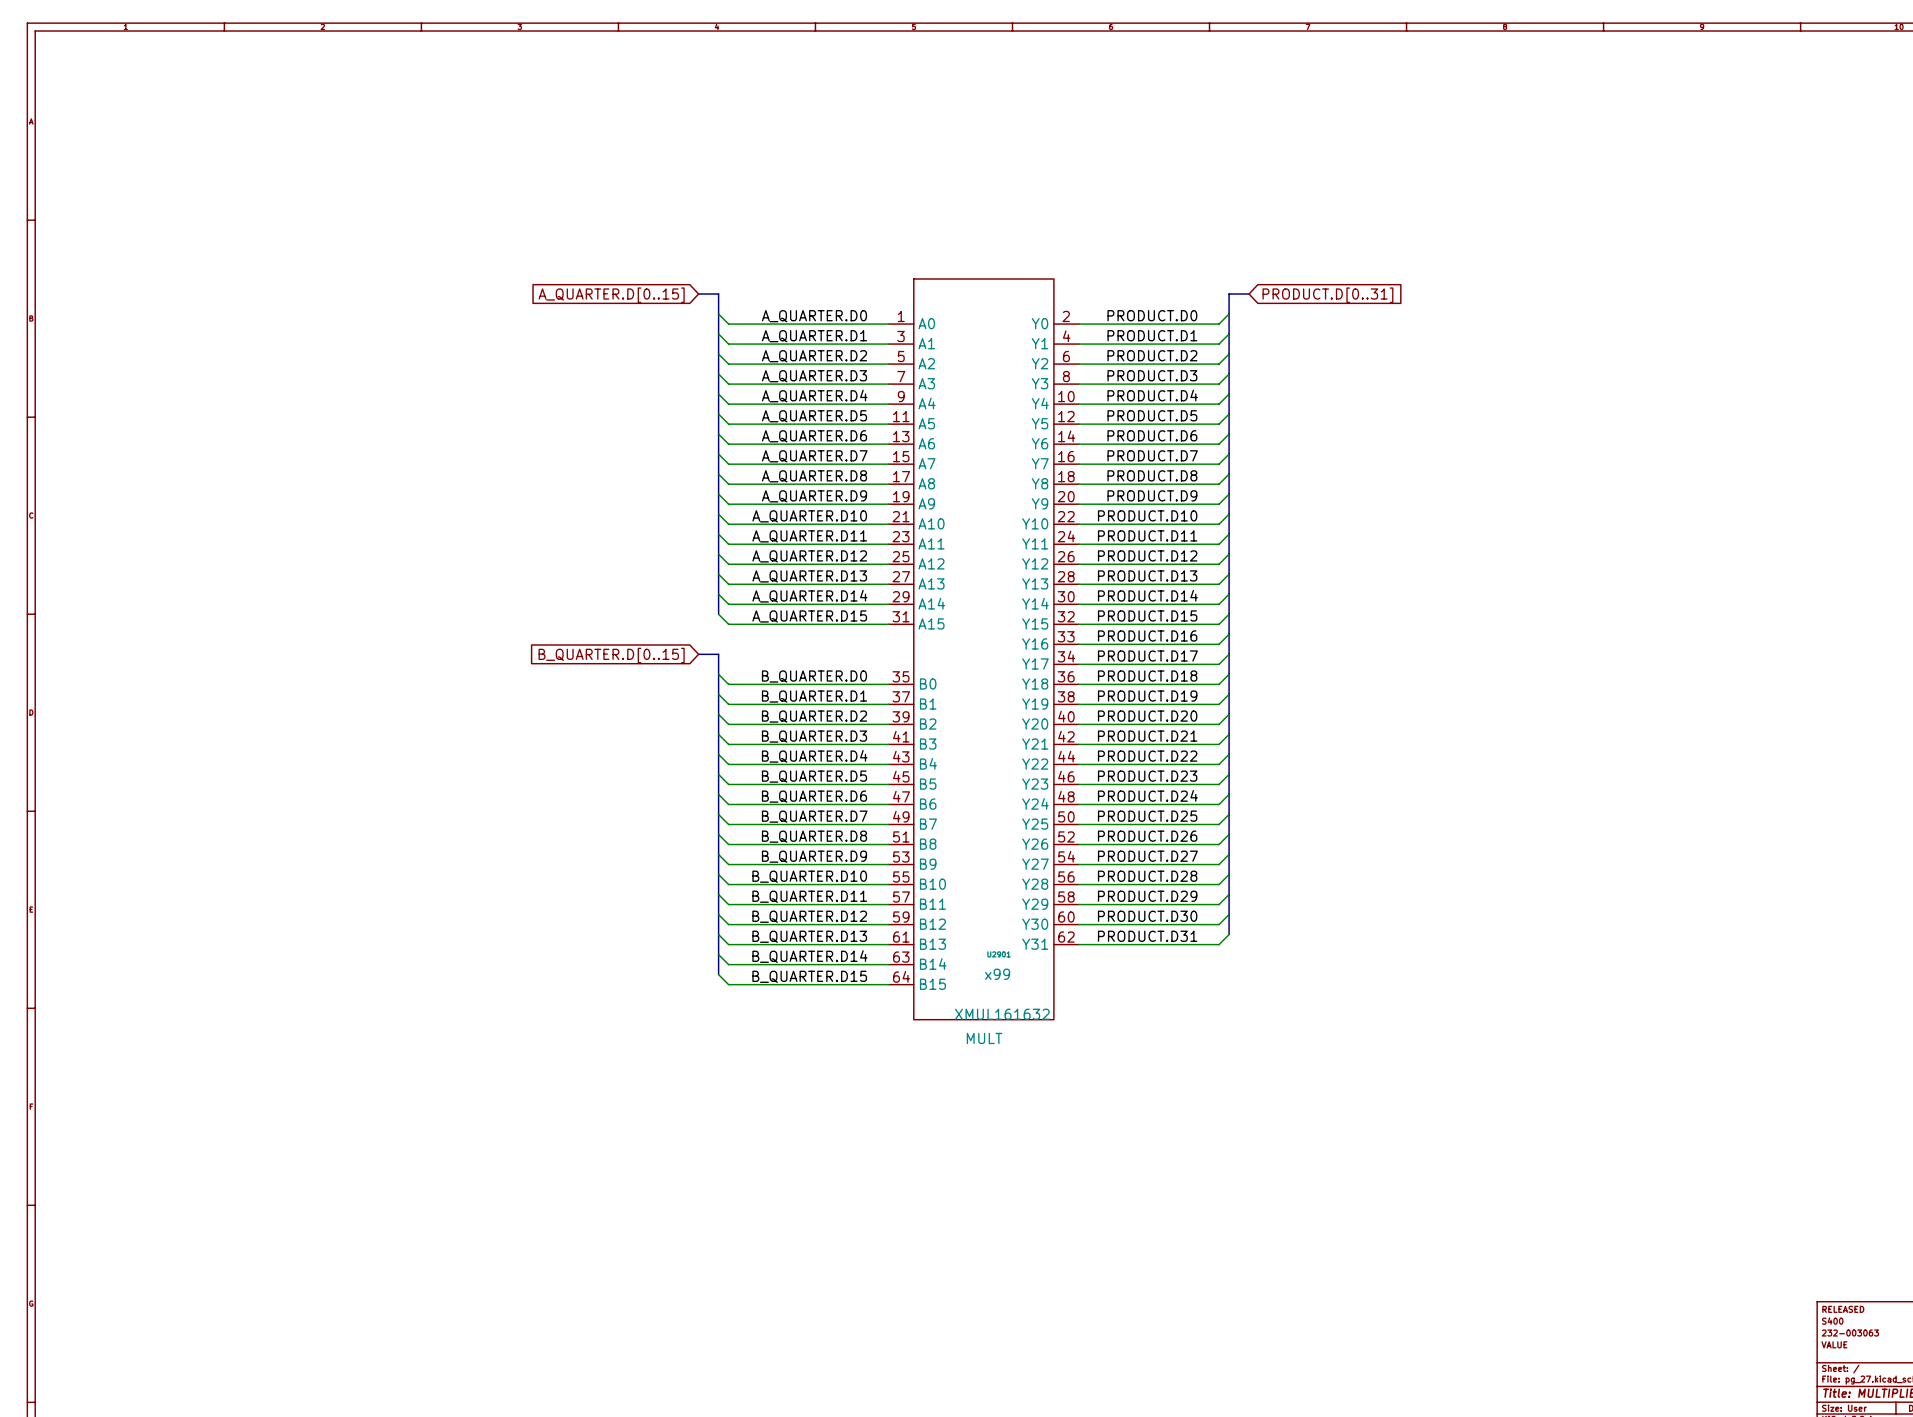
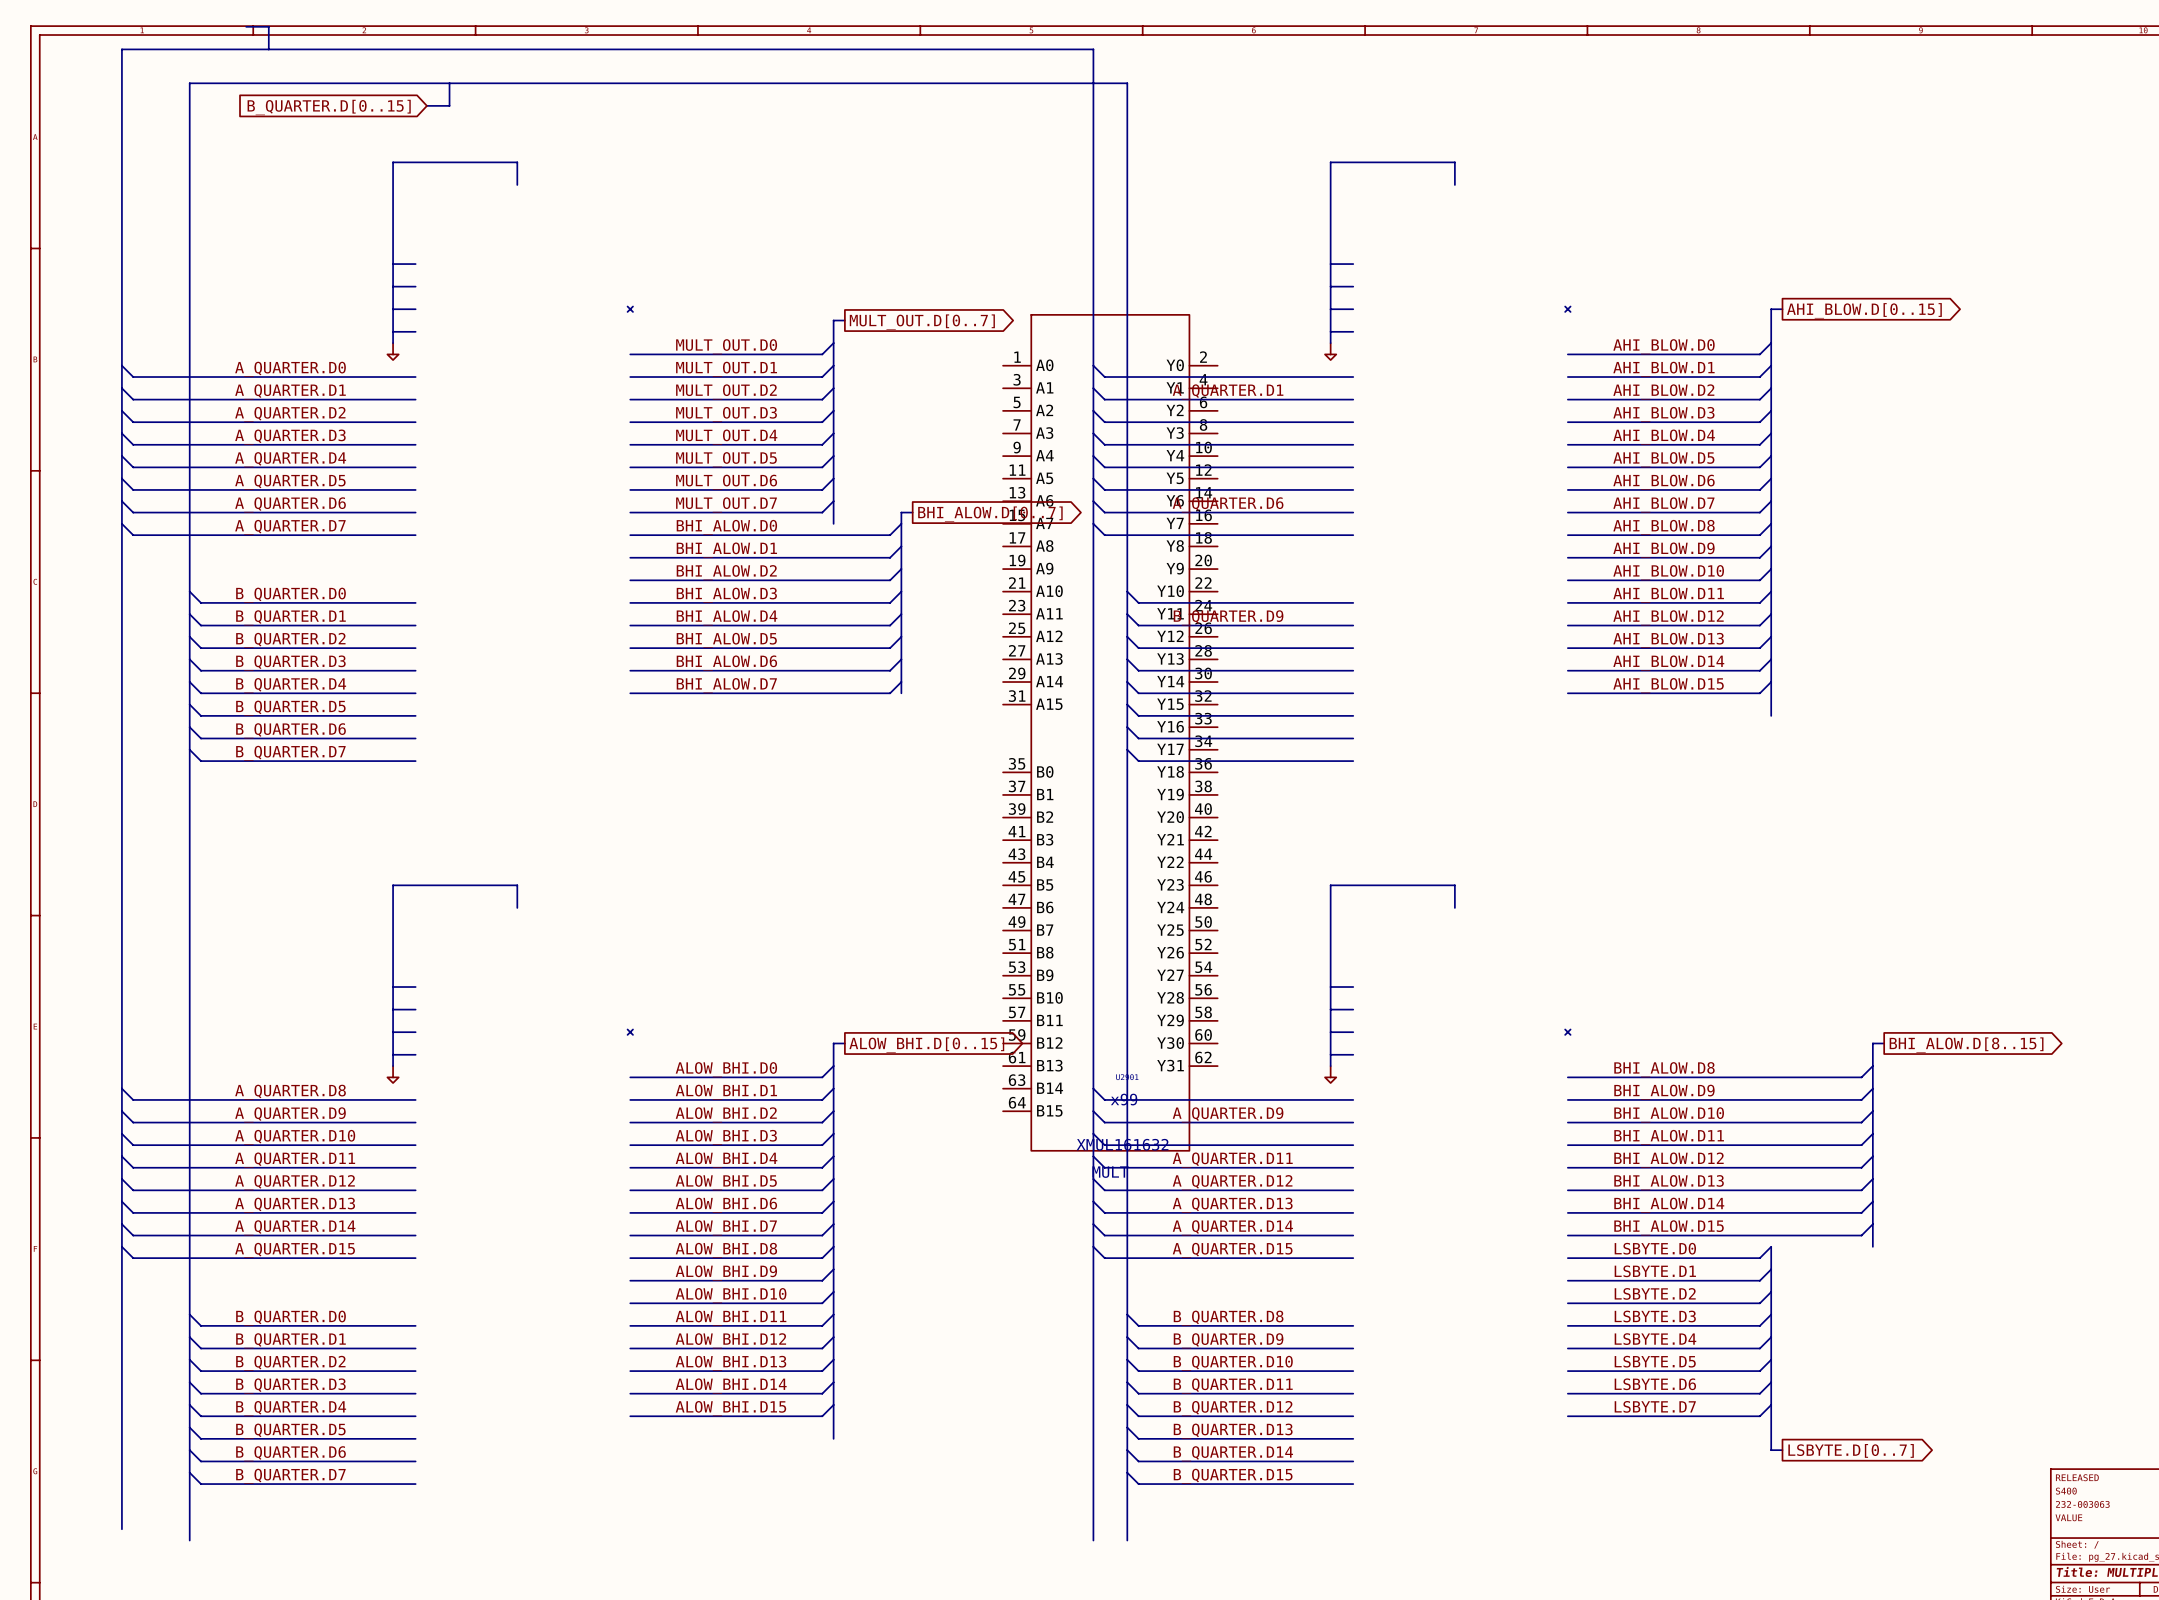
bus: none -> (246, 26) (268, 26) (268, 49)
bus: none -> (449, 83) (449, 105) (426, 105)
global label: none -> B_QUARTER.D[0..15] (329, 107)
wire: none -> (517, 184) (517, 162) (393, 162) (393, 343)
wire: none -> (1454, 184) (1454, 162) (1330, 162) (1330, 343)
wire: none -> (393, 264) (415, 264)
wire: none -> (1330, 264) (1353, 264)
wire: none -> (393, 286) (415, 286)
wire: none -> (1330, 286) (1353, 286)
wire: none -> (393, 309) (415, 309)
no-connect mark: none -> (630, 309)
wire: none -> (1330, 309) (1353, 309)
no-connect mark: none -> (1567, 309)
bus: none -> (1782, 309) (1771, 309) (1771, 715)
global label: none -> AHI_BLOW.D[0..15] (1864, 310)
bus: none -> (844, 320) (833, 320) (833, 523)
global label: none -> MULT_OUT.D[0..7] (922, 322)
wire: none -> (393, 331) (415, 331)
bus: (698, 294) (718, 294) (718, 614) -> none
wire: none -> (1330, 331) (1353, 331)
bus: (1249, 294) (1229, 294) (1229, 934) -> none
global label: A_QUARTER.D[0..15] (611, 295) -> none
global label: PRODUCT.D[0..31] (1327, 295) -> none
wire: none -> (833, 343) (822, 354) (630, 354)
wire: none -> (1771, 343) (1759, 354) (1567, 354)
label: none -> MULT_OUT.D0 (726, 346)
label: none -> AHI_BLOW.D0 (1663, 346)
power symbol: none -> (393, 351)
power symbol: none -> (1330, 351)
wire: (718, 314) (728, 324) (888, 324) -> none
wire: (1229, 314) (1219, 324) (1078, 324) -> none
label: PRODUCT.D0 (1152, 315) -> none
label: A_QUARTER.D0 (814, 316) -> none
wire: none -> (121, 365) (133, 377) (415, 377)
wire: none -> (833, 365) (822, 377) (630, 377)
wire: none -> (1093, 365) (1104, 377) (1353, 377)
wire: none -> (1771, 365) (1759, 377) (1567, 377)
label: none -> A_QUARTER.D0 (290, 369)
label: none -> MULT_OUT.D1 (726, 369)
label: none -> AHI_BLOW.D1 (1663, 369)
wire: (718, 334) (728, 344) (888, 344) -> none
wire: (1229, 334) (1219, 344) (1078, 344) -> none
label: PRODUCT.D1 (1152, 335) -> none
label: A_QUARTER.D1 (814, 336) -> none
wire: none -> (121, 388) (133, 399) (415, 399)
wire: none -> (833, 388) (822, 399) (630, 399)
wire: none -> (1093, 388) (1104, 399) (1353, 399)
wire: none -> (1771, 388) (1759, 399) (1567, 399)
label: none -> A_QUARTER.D1 (290, 391)
label: none -> MULT_OUT.D2 (726, 391)
label: none -> A_QUARTER.D1 (1228, 391)
label: none -> AHI_BLOW.D2 (1663, 391)
wire: (718, 354) (728, 364) (888, 364) -> none
wire: (1229, 354) (1219, 364) (1078, 364) -> none
label: PRODUCT.D2 (1152, 355) -> none
label: A_QUARTER.D2 (814, 356) -> none
wire: none -> (121, 410) (133, 422) (415, 422)
wire: none -> (833, 410) (822, 422) (630, 422)
wire: none -> (1093, 410) (1104, 422) (1353, 422)
wire: none -> (1771, 410) (1759, 422) (1567, 422)
label: none -> A_QUARTER.D2 (290, 414)
label: none -> MULT_OUT.D3 (726, 414)
label: none -> AHI_BLOW.D3 (1663, 414)
wire: (718, 374) (728, 384) (888, 384) -> none
wire: (1229, 374) (1219, 384) (1078, 384) -> none
label: PRODUCT.D3 (1152, 375) -> none
label: A_QUARTER.D3 (814, 376) -> none
wire: none -> (121, 433) (133, 444) (415, 444)
wire: none -> (833, 433) (822, 444) (630, 444)
wire: none -> (1093, 433) (1104, 444) (1353, 444)
wire: none -> (1771, 433) (1759, 444) (1567, 444)
label: none -> A_QUARTER.D3 (290, 437)
label: none -> MULT_OUT.D4 (726, 437)
label: none -> AHI_BLOW.D4 (1664, 437)
wire: (718, 394) (728, 404) (888, 404) -> none
wire: (1229, 394) (1219, 404) (1078, 404) -> none
label: PRODUCT.D4 (1152, 395) -> none
label: A_QUARTER.D4 (814, 396) -> none
wire: none -> (121, 456) (133, 467) (415, 467)
wire: none -> (833, 456) (822, 467) (630, 467)
wire: none -> (1093, 456) (1104, 467) (1353, 467)
wire: none -> (1771, 456) (1759, 467) (1567, 467)
label: none -> A_QUARTER.D4 (290, 459)
label: none -> MULT_OUT.D5 (726, 459)
label: none -> AHI_BLOW.D5 (1663, 459)
wire: (718, 414) (728, 424) (888, 424) -> none
wire: (1229, 414) (1219, 424) (1078, 424) -> none
label: PRODUCT.D5 (1152, 415) -> none
label: A_QUARTER.D5 (814, 416) -> none
wire: none -> (121, 478) (133, 489) (415, 489)
wire: none -> (833, 478) (822, 489) (630, 489)
wire: none -> (1093, 478) (1104, 489) (1353, 489)
wire: none -> (1771, 478) (1759, 489) (1567, 489)
label: none -> A_QUARTER.D5 (290, 482)
label: none -> MULT_OUT.D6 (726, 482)
label: none -> AHI_BLOW.D6 (1663, 482)
wire: (718, 434) (728, 444) (888, 444) -> none
wire: (1229, 434) (1219, 444) (1078, 444) -> none
label: PRODUCT.D6 (1152, 435) -> none
label: A_QUARTER.D6 (814, 436) -> none
wire: none -> (121, 501) (133, 512) (415, 512)
wire: none -> (833, 501) (822, 512) (630, 512)
wire: none -> (1093, 501) (1104, 512) (1353, 512)
wire: none -> (1771, 501) (1759, 512) (1567, 512)
label: none -> A_QUARTER.D6 (290, 504)
label: none -> MULT_OUT.D7 (726, 504)
label: none -> A_QUARTER.D6 (1228, 504)
label: none -> AHI_BLOW.D7 (1663, 504)
wire: (718, 454) (728, 464) (888, 464) -> none
bus: none -> (912, 512) (901, 512) (901, 693)
wire: (1229, 454) (1219, 464) (1078, 464) -> none
global label: none -> BHI_ALOW.D[0..7] (990, 514)
label: PRODUCT.D7 (1152, 455) -> none
label: A_QUARTER.D7 (814, 456) -> none
wire: none -> (121, 523) (133, 535) (415, 535)
wire: none -> (901, 523) (890, 535) (630, 535)
wire: none -> (1093, 523) (1104, 535) (1353, 535)
wire: none -> (1771, 523) (1759, 535) (1567, 535)
label: none -> A_QUARTER.D7 (290, 527)
label: none -> BHI_ALOW.D0 (726, 527)
label: none -> AHI_BLOW.D8 (1664, 527)
wire: (718, 474) (728, 484) (888, 484) -> none
wire: (1229, 474) (1219, 484) (1078, 484) -> none
label: PRODUCT.D8 (1152, 475) -> none
label: A_QUARTER.D8 (814, 476) -> none
wire: none -> (901, 546) (890, 557) (630, 557)
wire: none -> (1771, 546) (1759, 557) (1567, 557)
label: none -> BHI_ALOW.D1 (726, 550)
label: none -> AHI_BLOW.D9 (1663, 550)
wire: (718, 494) (728, 504) (888, 504) -> none
wire: (1229, 494) (1219, 504) (1078, 504) -> none
label: PRODUCT.D9 (1152, 495) -> none
label: A_QUARTER.D9 (814, 496) -> none
wire: none -> (901, 569) (890, 580) (630, 580)
wire: none -> (1771, 569) (1759, 580) (1567, 580)
label: none -> BHI_ALOW.D2 (726, 572)
label: none -> AHI_BLOW.D10 (1668, 572)
wire: (718, 514) (728, 524) (888, 524) -> none
wire: (1229, 514) (1219, 524) (1078, 524) -> none
label: PRODUCT.D10 (1147, 515) -> none
label: A_QUARTER.D10 (809, 516) -> none
wire: none -> (189, 591) (201, 602) (415, 602)
wire: none -> (901, 591) (890, 602) (630, 602)
wire: none -> (1127, 591) (1138, 602) (1353, 602)
wire: none -> (1771, 591) (1759, 602) (1567, 602)
label: none -> B_QUARTER.D0 (291, 595)
label: none -> BHI_ALOW.D3 (726, 595)
label: none -> AHI_BLOW.D11 (1668, 595)
wire: (718, 534) (728, 544) (888, 544) -> none
wire: (1229, 534) (1219, 544) (1078, 544) -> none
label: PRODUCT.D11 (1147, 535) -> none
label: A_QUARTER.D11 (809, 536) -> none
wire: none -> (189, 614) (201, 625) (415, 625)
wire: none -> (901, 614) (890, 625) (630, 625)
wire: none -> (1127, 614) (1138, 625) (1353, 625)
wire: none -> (1771, 614) (1759, 625) (1567, 625)
label: none -> B_QUARTER.D1 (290, 617)
label: none -> BHI_ALOW.D4 (727, 617)
label: none -> B_QUARTER.D9 (1228, 617)
label: none -> AHI_BLOW.D12 (1668, 617)
wire: (718, 554) (728, 564) (888, 564) -> none
wire: (1229, 554) (1219, 564) (1078, 564) -> none
label: PRODUCT.D12 (1147, 555) -> none
label: A_QUARTER.D12 (809, 556) -> none
wire: none -> (189, 636) (201, 648) (415, 648)
wire: none -> (901, 636) (890, 648) (630, 648)
wire: none -> (1127, 636) (1138, 648) (1353, 648)
wire: none -> (1771, 636) (1759, 648) (1567, 648)
label: none -> B_QUARTER.D2 (290, 640)
label: none -> BHI_ALOW.D5 (726, 640)
label: none -> AHI_BLOW.D13 (1668, 640)
wire: (718, 574) (728, 584) (888, 584) -> none
wire: (1229, 574) (1219, 584) (1078, 584) -> none
label: PRODUCT.D13 (1147, 575) -> none
label: A_QUARTER.D13 (809, 576) -> none
wire: none -> (189, 659) (201, 670) (415, 670)
wire: none -> (901, 659) (890, 670) (630, 670)
wire: none -> (1127, 659) (1138, 670) (1353, 670)
wire: none -> (1771, 659) (1759, 670) (1567, 670)
label: none -> B_QUARTER.D3 (290, 663)
label: none -> BHI_ALOW.D6 (726, 663)
label: none -> AHI_BLOW.D14 (1668, 663)
wire: (718, 594) (728, 604) (888, 604) -> none
wire: (1229, 594) (1219, 604) (1078, 604) -> none
label: PRODUCT.D14 (1147, 595) -> none
label: A_QUARTER.D14 (809, 596) -> none
wire: none -> (189, 682) (201, 693) (415, 693)
wire: none -> (901, 682) (890, 693) (630, 693)
wire: none -> (1127, 682) (1138, 693) (1353, 693)
wire: none -> (1771, 682) (1759, 693) (1567, 693)
label: none -> B_QUARTER.D4 (291, 685)
label: none -> BHI_ALOW.D7 (726, 685)
label: none -> AHI_BLOW.D15 (1668, 685)
wire: (718, 614) (728, 624) (888, 624) -> none
wire: (1229, 614) (1219, 624) (1078, 624) -> none
label: PRODUCT.D15 (1147, 615) -> none
label: A_QUARTER.D15 (809, 616) -> none
wire: none -> (189, 704) (201, 715) (415, 715)
wire: none -> (1127, 704) (1138, 715) (1353, 715)
label: none -> B_QUARTER.D5 (290, 708)
wire: (1229, 634) (1219, 644) (1078, 644) -> none
label: PRODUCT.D16 (1147, 636) -> none
wire: none -> (189, 727) (201, 738) (415, 738)
wire: none -> (1127, 727) (1138, 738) (1353, 738)
label: none -> B_QUARTER.D6 (291, 730)
bus: (698, 654) (718, 654) (718, 974) -> none
wire: (1229, 654) (1219, 664) (1078, 664) -> none
global label: B_QUARTER.D[0..15] (611, 655) -> none
label: PRODUCT.D17 (1147, 656) -> none
wire: none -> (189, 749) (201, 761) (415, 761)
wire: none -> (1127, 749) (1138, 761) (1353, 761)
label: none -> B_QUARTER.D7 (290, 753)
wire: (718, 674) (728, 684) (888, 684) -> none
wire: (1229, 674) (1219, 684) (1078, 684) -> none
label: B_QUARTER.D0 (814, 676) -> none
label: PRODUCT.D18 (1147, 676) -> none
wire: (718, 694) (728, 704) (888, 704) -> none
wire: (1229, 694) (1219, 704) (1078, 704) -> none
label: B_QUARTER.D1 (814, 696) -> none
label: PRODUCT.D19 (1147, 696) -> none
wire: (718, 714) (728, 724) (888, 724) -> none
wire: (1229, 714) (1219, 724) (1078, 724) -> none
label: B_QUARTER.D2 (814, 716) -> none
label: PRODUCT.D20 (1147, 716) -> none
wire: (718, 734) (728, 744) (888, 744) -> none
wire: (1229, 734) (1219, 744) (1078, 744) -> none
label: B_QUARTER.D3 (814, 736) -> none
label: PRODUCT.D21 (1147, 736) -> none
wire: (718, 754) (728, 764) (888, 764) -> none
wire: (1229, 754) (1219, 764) (1078, 764) -> none
label: B_QUARTER.D4 (814, 756) -> none
label: PRODUCT.D22 (1147, 756) -> none
wire: (718, 774) (728, 784) (888, 784) -> none
wire: (1229, 774) (1219, 784) -> (1454, 907) (1454, 885) (1375, 885)
label: B_QUARTER.D5 (814, 776) -> none
label: PRODUCT.D23 (1147, 776) -> none
wire: (1078, 784) (1179, 784) -> (1330, 1066) (1330, 885)
wire: (718, 794) (728, 804) (888, 804) -> none
wire: (1229, 794) (1219, 804) (1078, 804) -> none
label: PRODUCT.D24 (1147, 795) -> none
label: B_QUARTER.D6 (814, 796) -> none
wire: none -> (517, 907) (517, 885) (393, 885) (393, 1066)
wire: (718, 814) (728, 824) (888, 824) -> none
wire: (1229, 814) (1219, 824) (1078, 824) -> none
label: B_QUARTER.D7 (814, 816) -> none
label: PRODUCT.D25 (1147, 816) -> none
wire: (718, 834) (728, 844) (888, 844) -> none
wire: (1229, 834) (1219, 844) (1078, 844) -> none
label: B_QUARTER.D8 (814, 836) -> none
label: PRODUCT.D26 (1147, 836) -> none
wire: (718, 854) (728, 864) (888, 864) -> none
wire: (1229, 854) (1219, 864) (1078, 864) -> none
label: B_QUARTER.D9 (814, 856) -> none
label: PRODUCT.D27 (1147, 856) -> none
wire: none -> (393, 987) (415, 987)
wire: (718, 874) (728, 884) (888, 884) -> none
wire: none -> (1330, 987) (1353, 987)
wire: (1229, 874) (1219, 884) (1078, 884) -> none
label: B_QUARTER.D10 (809, 876) -> none
label: PRODUCT.D28 (1147, 876) -> none
wire: none -> (393, 1009) (415, 1009)
wire: (718, 894) (728, 904) (888, 904) -> none
wire: none -> (1330, 1009) (1353, 1009)
wire: (1229, 894) (1219, 904) (1078, 904) -> none
label: B_QUARTER.D11 (809, 896) -> none
label: PRODUCT.D29 (1147, 896) -> none
wire: none -> (393, 1032) (415, 1032)
no-connect mark: none -> (630, 1032)
wire: (718, 914) (728, 924) (888, 924) -> none
wire: none -> (1330, 1032) (1353, 1032)
wire: (1229, 914) (1219, 924) (1078, 924) -> none
no-connect mark: none -> (1567, 1032)
label: B_QUARTER.D12 (809, 916) -> none
label: PRODUCT.D30 (1147, 916) -> none
bus: none -> (844, 1043) (833, 1043) (833, 1438)
bus: none -> (1884, 1043) (1872, 1043) (1872, 1246)
global label: none -> ALOW_BHI.D[0..15] (926, 1045)
global label: none -> BHI_ALOW.D[8..15] (1966, 1045)
wire: none -> (393, 1054) (415, 1054)
wire: (718, 934) (728, 944) (888, 944) -> none
wire: none -> (1330, 1054) (1353, 1054)
wire: (1229, 934) (1219, 944) (1078, 944) -> none
label: B_QUARTER.D13 (809, 936) -> none
label: PRODUCT.D31 (1147, 936) -> none
wire: none -> (833, 1066) (822, 1077) (630, 1077)
wire: none -> (1872, 1066) (1861, 1077) (1567, 1077)
label: none -> ALOW_BHI.D0 (726, 1069)
label: none -> BHI_ALOW.D8 (1664, 1069)
power symbol: none -> (393, 1074)
power symbol: none -> (1330, 1074)
wire: (718, 954) (728, 964) (888, 964) -> none
label: B_QUARTER.D14 (809, 956) -> none
wire: none -> (121, 1088) (133, 1099) (415, 1099)
wire: none -> (833, 1088) (822, 1099) (630, 1099)
wire: none -> (1093, 1088) (1104, 1099) (1353, 1099)
wire: none -> (1872, 1088) (1861, 1099) (1567, 1099)
label: none -> A_QUARTER.D8 (290, 1092)
label: none -> ALOW_BHI.D1 (726, 1092)
label: none -> BHI_ALOW.D9 (1664, 1092)
wire: (718, 974) (728, 984) (888, 984) -> none
label: B_QUARTER.D15 (809, 976) -> none
wire: none -> (121, 1111) (133, 1122) (415, 1122)
wire: none -> (833, 1111) (822, 1122) (630, 1122)
wire: none -> (1093, 1111) (1104, 1122) (1353, 1122)
wire: none -> (1872, 1111) (1861, 1122) (1567, 1122)
label: none -> A_QUARTER.D9 (290, 1114)
label: none -> ALOW_BHI.D2 (726, 1114)
label: none -> A_QUARTER.D9 (1228, 1114)
label: none -> BHI_ALOW.D10 (1669, 1114)
wire: none -> (121, 1133) (133, 1145) (415, 1145)
wire: none -> (833, 1133) (822, 1145) (630, 1145)
wire: none -> (1093, 1133) (1104, 1145) (1353, 1145)
wire: none -> (1872, 1133) (1861, 1145) (1567, 1145)
label: none -> A_QUARTER.D10 (295, 1137)
label: none -> ALOW_BHI.D3 (726, 1137)
label: none -> BHI_ALOW.D11 (1669, 1137)
wire: none -> (121, 1156) (133, 1167) (415, 1167)
wire: none -> (833, 1156) (822, 1167) (630, 1167)
wire: none -> (1093, 1156) (1104, 1167) (1353, 1167)
wire: none -> (1872, 1156) (1861, 1167) (1567, 1167)
label: none -> A_QUARTER.D11 (295, 1160)
label: none -> ALOW_BHI.D4 (726, 1160)
label: none -> A_QUARTER.D11 (1232, 1160)
label: none -> BHI_ALOW.D12 (1668, 1160)
wire: none -> (121, 1179) (133, 1190) (415, 1190)
wire: none -> (833, 1179) (822, 1190) (630, 1190)
wire: none -> (1093, 1179) (1104, 1190) (1353, 1190)
wire: none -> (1872, 1179) (1861, 1190) (1567, 1190)
label: none -> A_QUARTER.D12 (295, 1182)
label: none -> ALOW_BHI.D5 (726, 1182)
label: none -> A_QUARTER.D12 (1232, 1182)
label: none -> BHI_ALOW.D13 (1669, 1182)
wire: none -> (121, 1201) (133, 1212) (415, 1212)
wire: none -> (833, 1201) (822, 1212) (630, 1212)
wire: none -> (1093, 1201) (1104, 1212) (1353, 1212)
wire: none -> (1872, 1201) (1861, 1212) (1567, 1212)
label: none -> A_QUARTER.D13 (295, 1205)
label: none -> ALOW_BHI.D6 (726, 1205)
label: none -> A_QUARTER.D13 (1232, 1205)
label: none -> BHI_ALOW.D14 (1669, 1205)
wire: none -> (121, 1224) (133, 1235) (415, 1235)
wire: none -> (833, 1224) (822, 1235) (630, 1235)
wire: none -> (1093, 1224) (1104, 1235) (1353, 1235)
wire: none -> (1872, 1224) (1861, 1235) (1567, 1235)
label: none -> A_QUARTER.D14 (295, 1227)
label: none -> ALOW_BHI.D7 (726, 1227)
label: none -> A_QUARTER.D14 (1232, 1227)
label: none -> BHI_ALOW.D15 (1669, 1227)
wire: none -> (121, 1246) (133, 1258) (415, 1258)
wire: none -> (833, 1246) (822, 1258) (630, 1258)
wire: none -> (1093, 1246) (1104, 1258) (1353, 1258)
bus: none -> (1771, 1246) (1771, 1450) (1782, 1450)
wire: none -> (1771, 1246) (1759, 1258) (1567, 1258)
label: none -> A_QUARTER.D15 (295, 1250)
label: none -> ALOW_BHI.D8 (726, 1250)
label: none -> A_QUARTER.D15 (1232, 1250)
label: none -> LSBYTE.D0 (1655, 1248)
wire: none -> (833, 1269) (822, 1280) (630, 1280)
wire: none -> (1771, 1269) (1759, 1280) (1567, 1280)
label: none -> ALOW_BHI.D9 (726, 1273)
label: none -> LSBYTE.D1 (1655, 1271)
wire: none -> (833, 1292) (822, 1303) (630, 1303)
wire: none -> (1771, 1292) (1759, 1303) (1567, 1303)
label: none -> ALOW_BHI.D10 (731, 1295)
label: none -> LSBYTE.D2 (1655, 1293)
wire: none -> (189, 1314) (201, 1325) (415, 1325)
wire: none -> (833, 1314) (822, 1325) (630, 1325)
wire: none -> (1127, 1314) (1138, 1325) (1353, 1325)
wire: none -> (1771, 1314) (1759, 1325) (1567, 1325)
label: none -> B_QUARTER.D0 (291, 1318)
label: none -> ALOW_BHI.D11 (731, 1318)
label: none -> B_QUARTER.D8 (1228, 1318)
label: none -> LSBYTE.D3 (1655, 1316)
wire: none -> (189, 1337) (201, 1348) (415, 1348)
wire: none -> (833, 1337) (822, 1348) (630, 1348)
wire: none -> (1127, 1337) (1138, 1348) (1353, 1348)
wire: none -> (1771, 1337) (1759, 1348) (1567, 1348)
label: none -> B_QUARTER.D1 (290, 1340)
label: none -> ALOW_BHI.D12 (730, 1340)
label: none -> B_QUARTER.D9 (1228, 1340)
label: none -> LSBYTE.D4 (1655, 1339)
wire: none -> (189, 1359) (201, 1371) (415, 1371)
wire: none -> (833, 1359) (822, 1371) (630, 1371)
wire: none -> (1127, 1359) (1138, 1371) (1353, 1371)
wire: none -> (1771, 1359) (1759, 1371) (1567, 1371)
label: none -> B_QUARTER.D2 (290, 1363)
label: none -> ALOW_BHI.D13 (730, 1363)
label: none -> B_QUARTER.D10 (1233, 1363)
label: none -> LSBYTE.D5 (1655, 1361)
wire: none -> (189, 1382) (201, 1393) (415, 1393)
wire: none -> (833, 1382) (822, 1393) (630, 1393)
wire: none -> (1127, 1382) (1138, 1393) (1353, 1393)
wire: none -> (1771, 1382) (1759, 1393) (1567, 1393)
label: none -> ALOW_BHI.D14 (731, 1385)
label: none -> LSBYTE.D6 (1655, 1384)
label: none -> B_QUARTER.D3 (290, 1385)
label: none -> B_QUARTER.D11 (1233, 1385)
wire: none -> (189, 1404) (201, 1416) (415, 1416)
wire: none -> (833, 1404) (822, 1416) (630, 1416)
wire: none -> (1127, 1404) (1138, 1416) (1353, 1416)
wire: none -> (1771, 1404) (1759, 1416) (1567, 1416)
label: none -> B_QUARTER.D4 (291, 1408)
label: none -> LSBYTE.D7 (1655, 1406)
label: none -> ALOW_BHI.D15 (730, 1408)
label: none -> B_QUARTER.D12 (1233, 1408)
wire: none -> (189, 1427) (201, 1438) (415, 1438)
wire: none -> (1127, 1427) (1138, 1438) (1353, 1438)
label: none -> B_QUARTER.D5 (290, 1431)
label: none -> B_QUARTER.D13 (1233, 1431)
wire: none -> (189, 1450) (201, 1461) (415, 1461)
wire: none -> (1127, 1450) (1138, 1461) (1353, 1461)
label: none -> B_QUARTER.D14 (1233, 1453)
global label: none -> LSBYTE.D[0..7] (1851, 1450)
label: none -> B_QUARTER.D6 (291, 1453)
wire: none -> (189, 1472) (201, 1484) (415, 1484)
wire: none -> (1127, 1472) (1138, 1484) (1353, 1484)
label: none -> B_QUARTER.D7 (290, 1476)
label: none -> B_QUARTER.D15 (1233, 1476)
bus: none -> (121, 1529) (121, 49) (1093, 49) (1093, 1540)
bus: none -> (189, 1540) (189, 83) (1127, 83) (1127, 1540)

